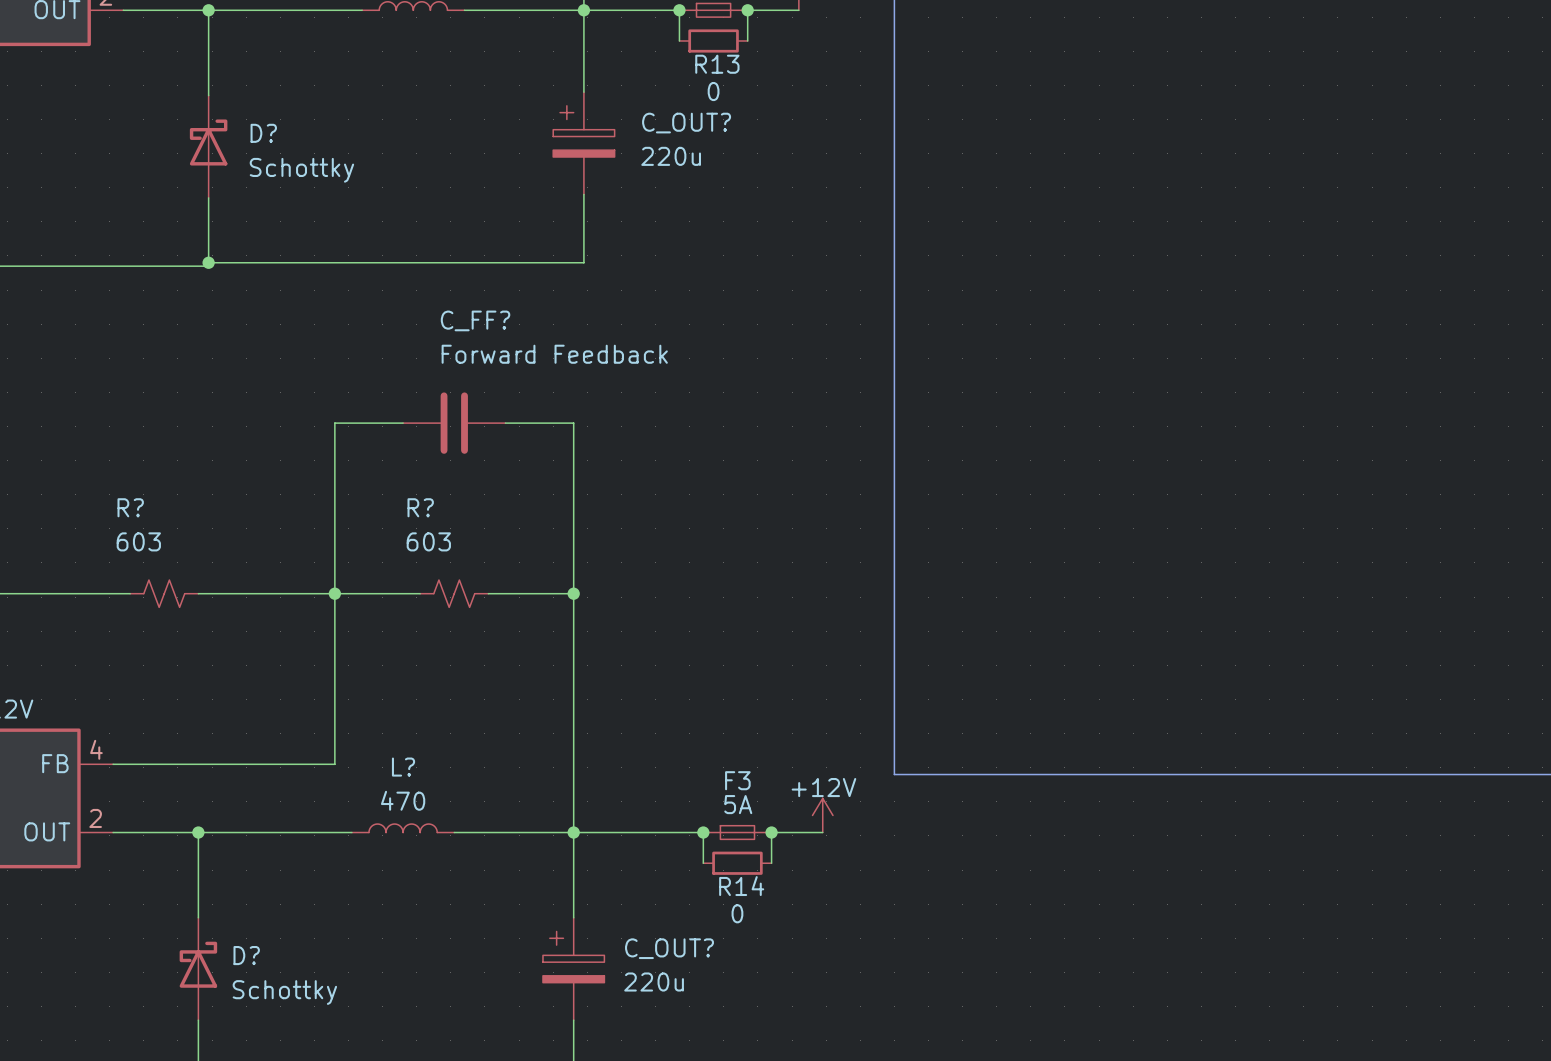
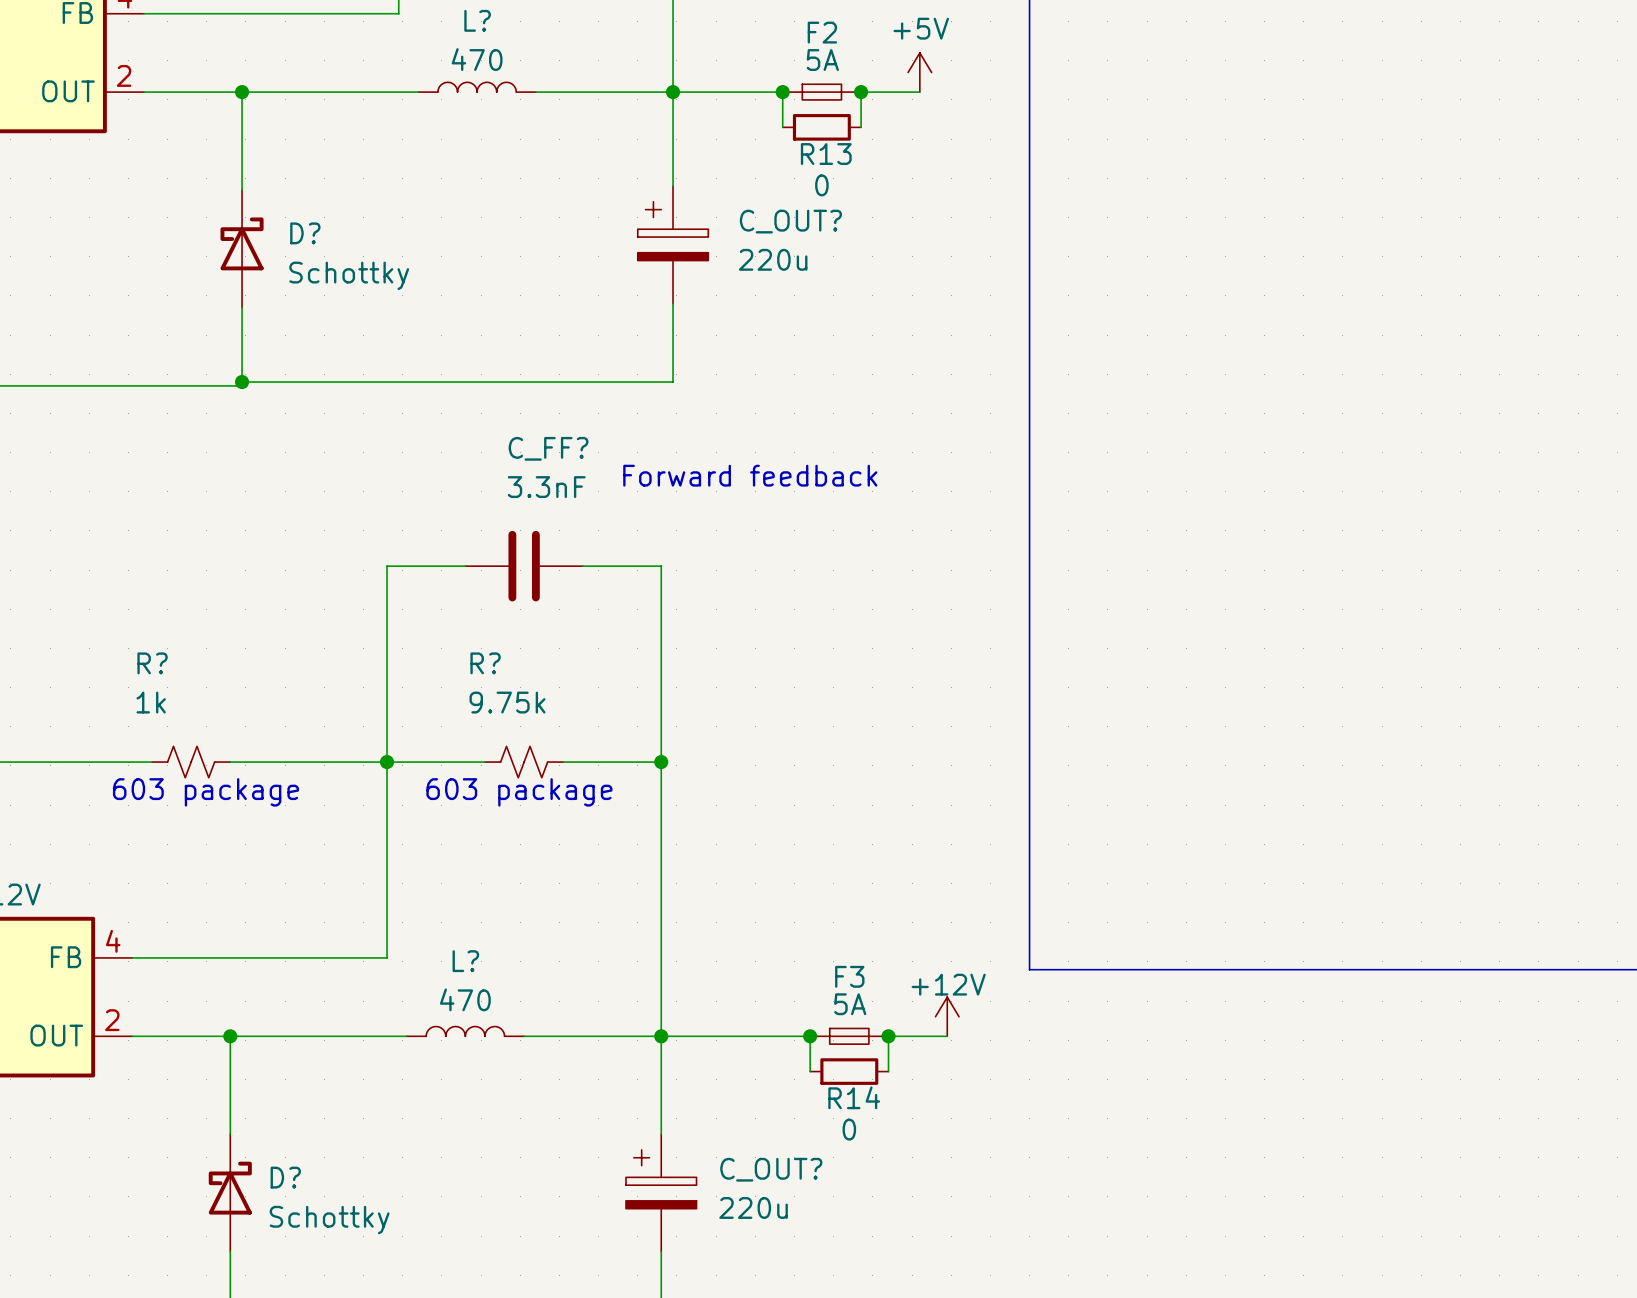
text: none -> Forward feedback (750, 475)
C_FF? value: Forward Feedback (554, 354) -> 3.3nF (546, 487)
R? value: 603 (138, 541) -> 1k (151, 702)
R? value: 603 (428, 541) -> 9.75k (507, 702)
text: none -> 603 package (206, 792)
text: none -> 603 package (519, 792)

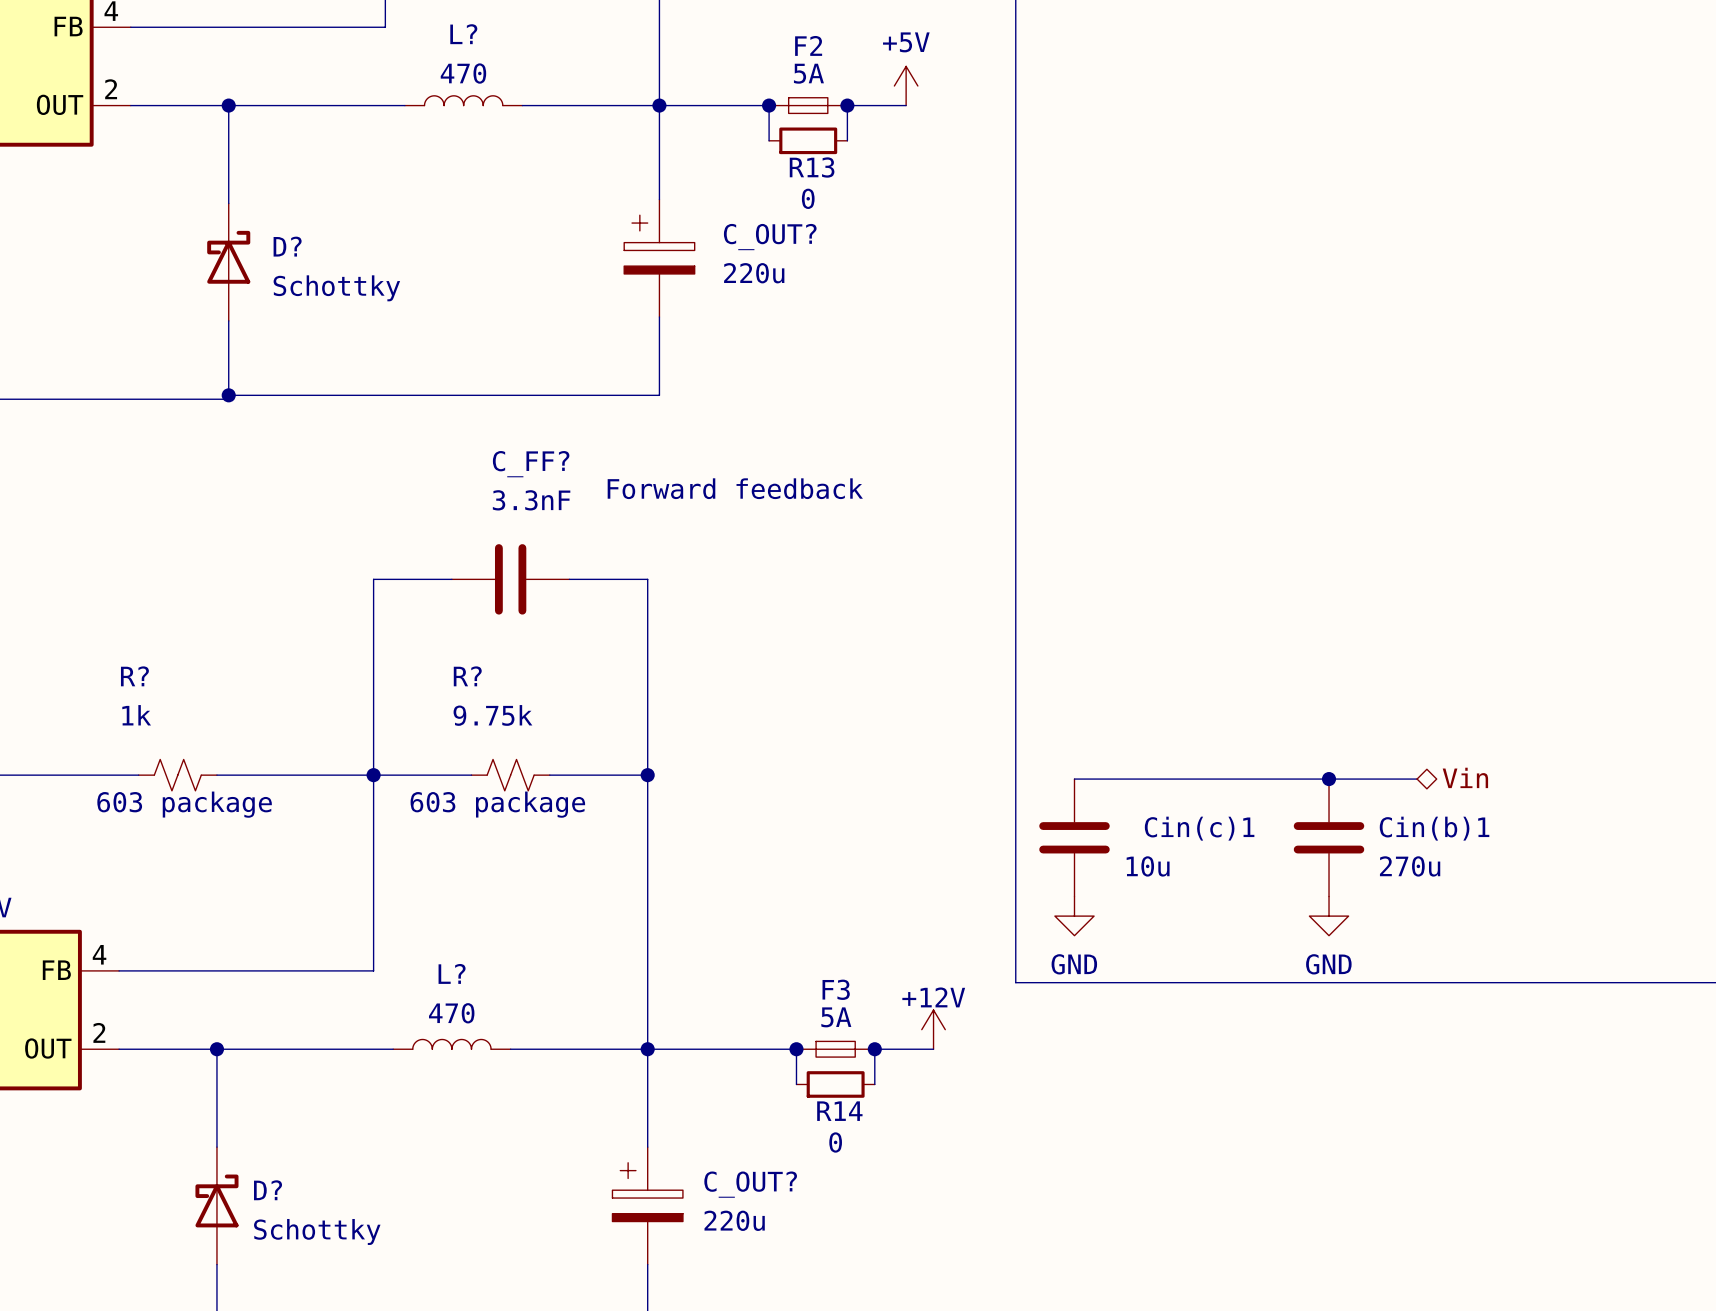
wire: none -> (1074, 779) (1417, 779)
junction: none -> (1329, 779)
hierarchical label: none -> Vin (1465, 777)
Cin(c)1: none -> 10u (1074, 837)
Cin(b)1: none -> 270u (1329, 837)
power symbol: none -> GND (1074, 916)
power symbol: none -> GND (1329, 916)

